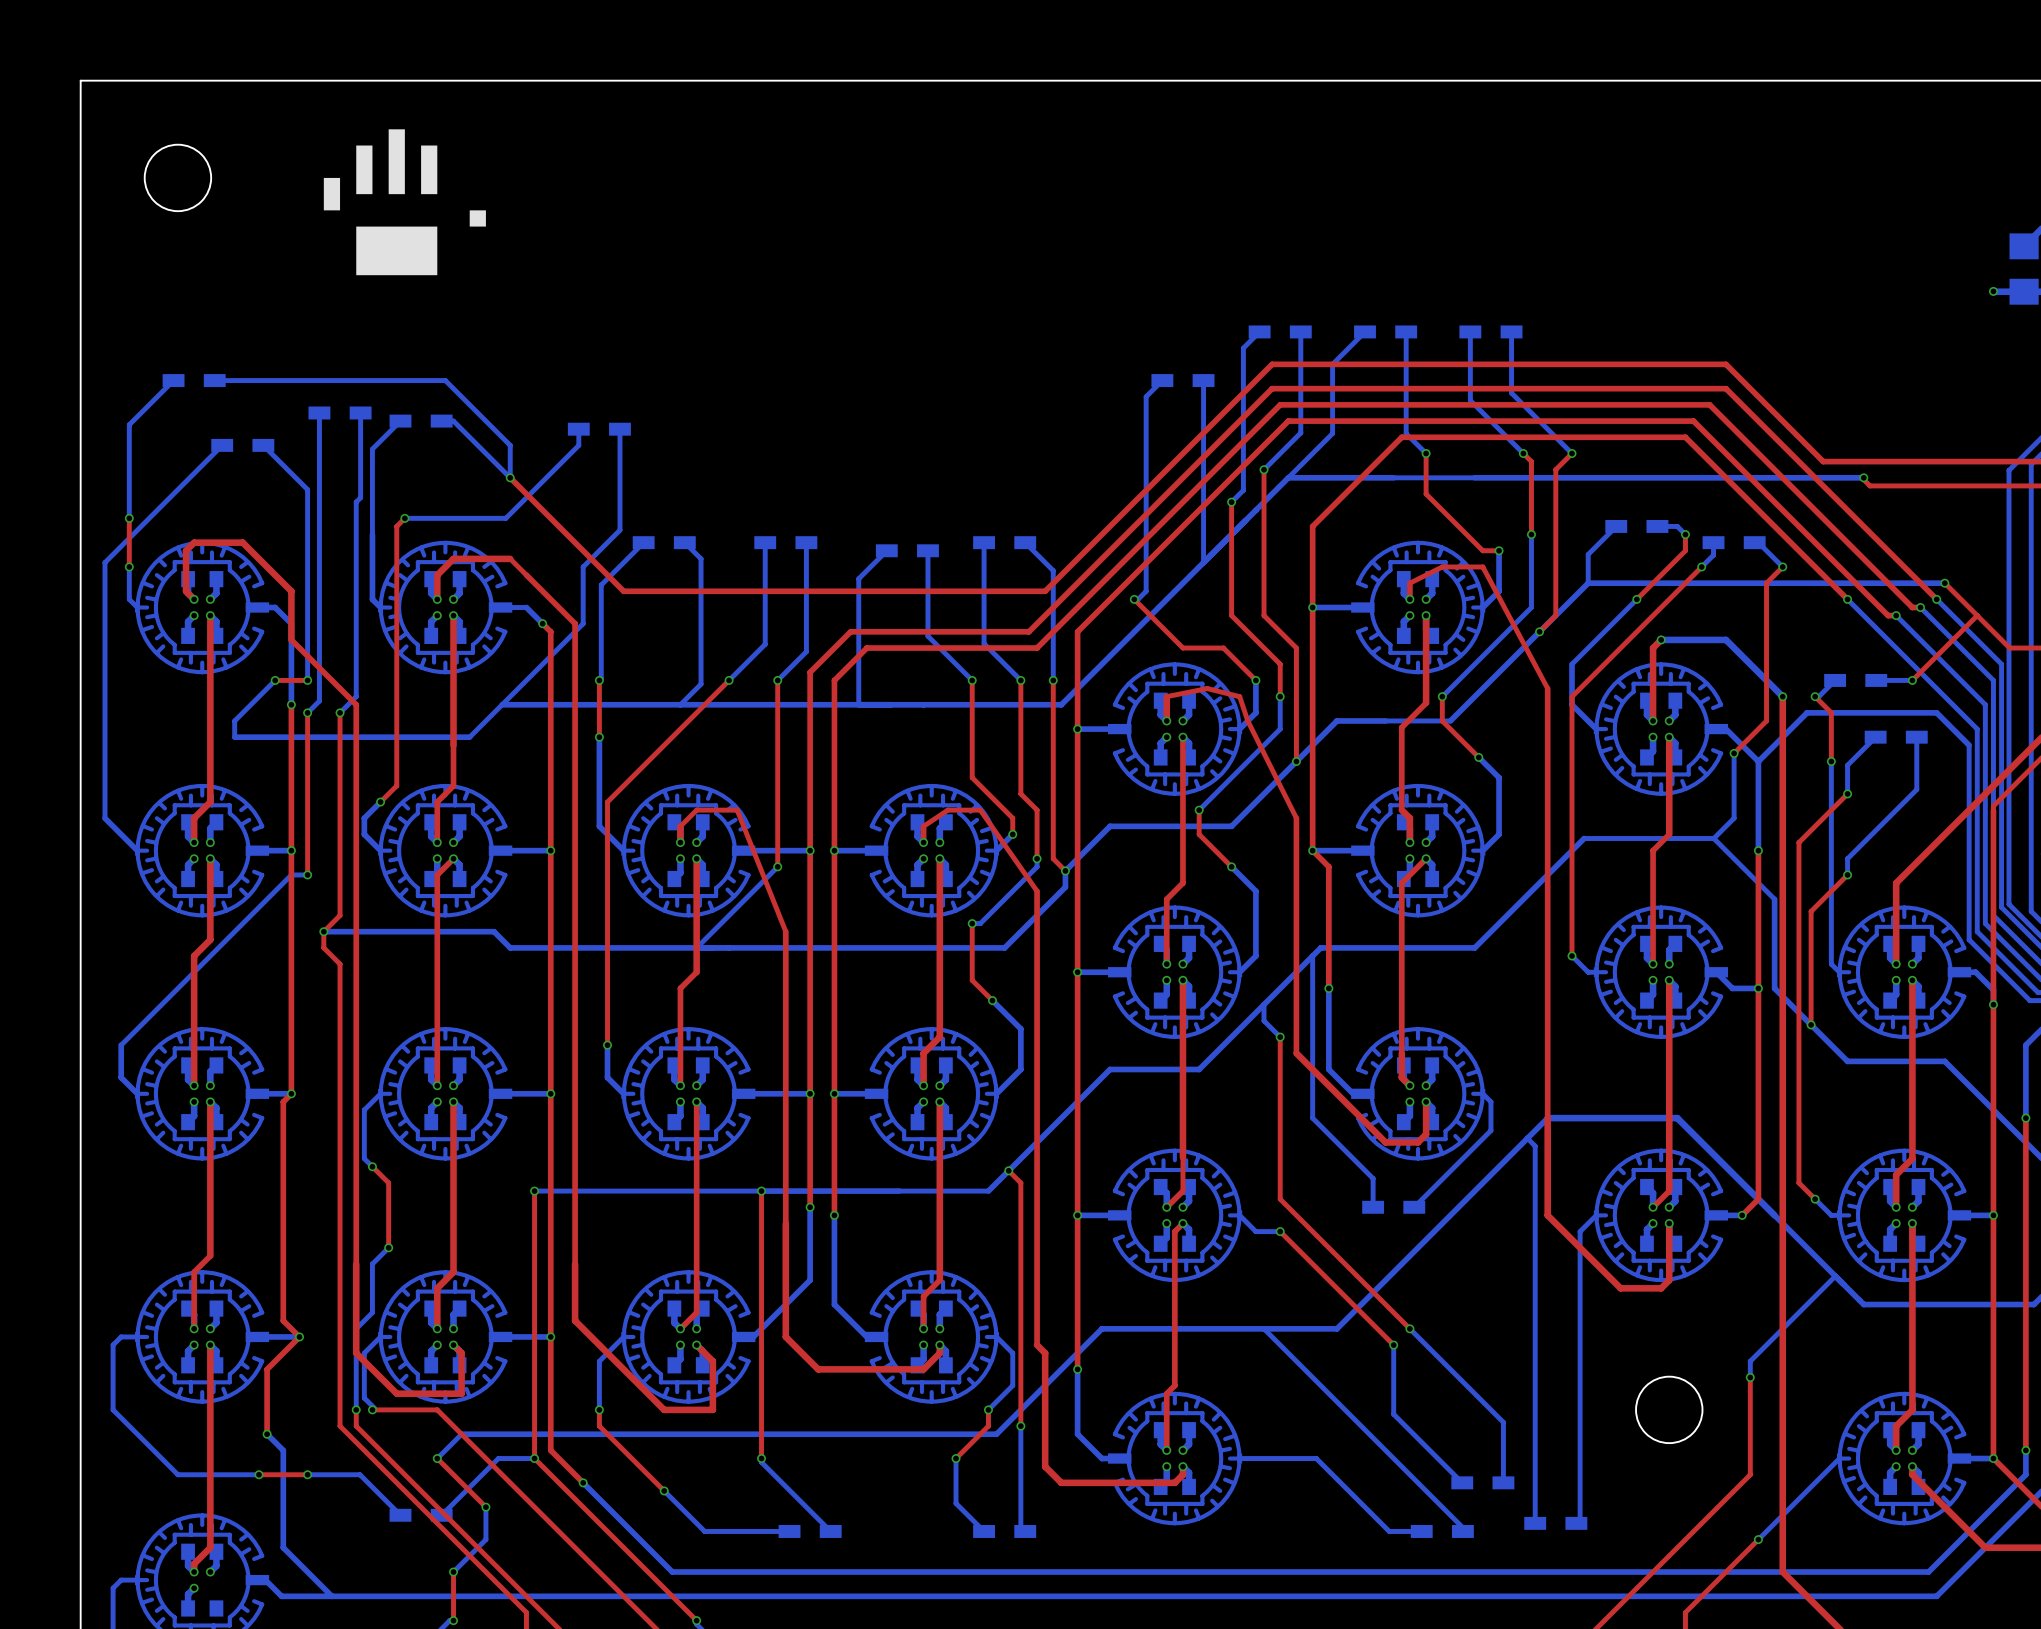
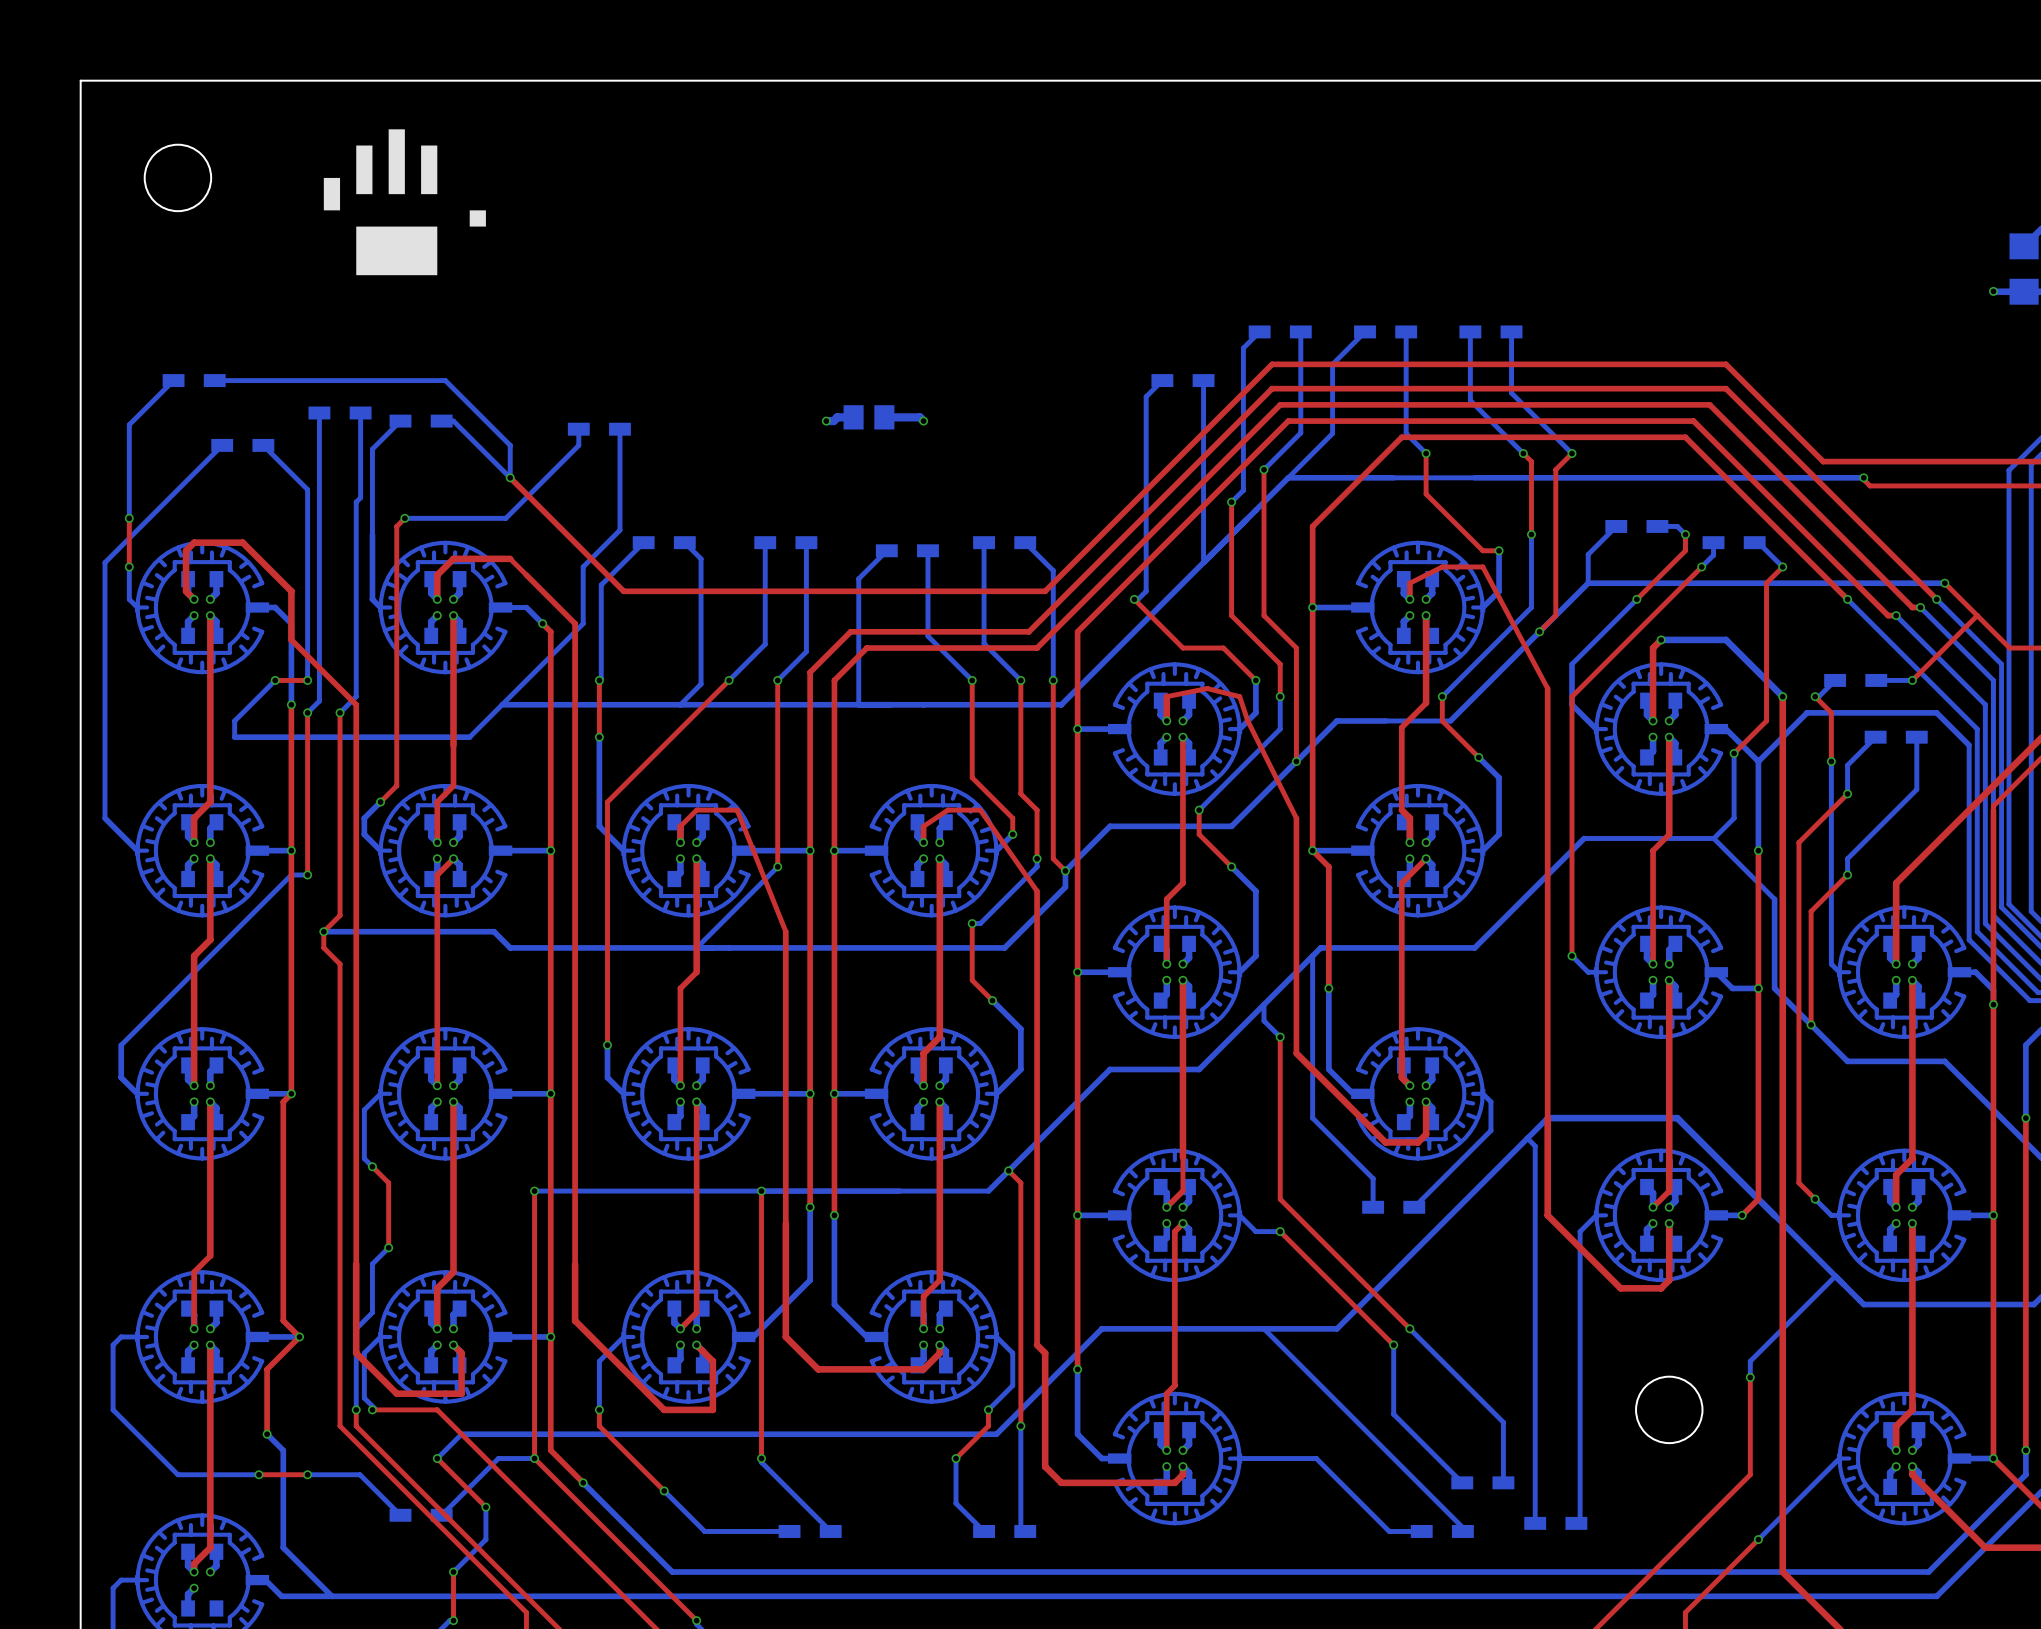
bottom track: none -> (853, 417) (837, 417) (833, 421) (826, 421)
part: none -> (868, 417)
bottom track: none -> (884, 417) (919, 417) (923, 421)
via: none -> (826, 421)
via: none -> (923, 421)

